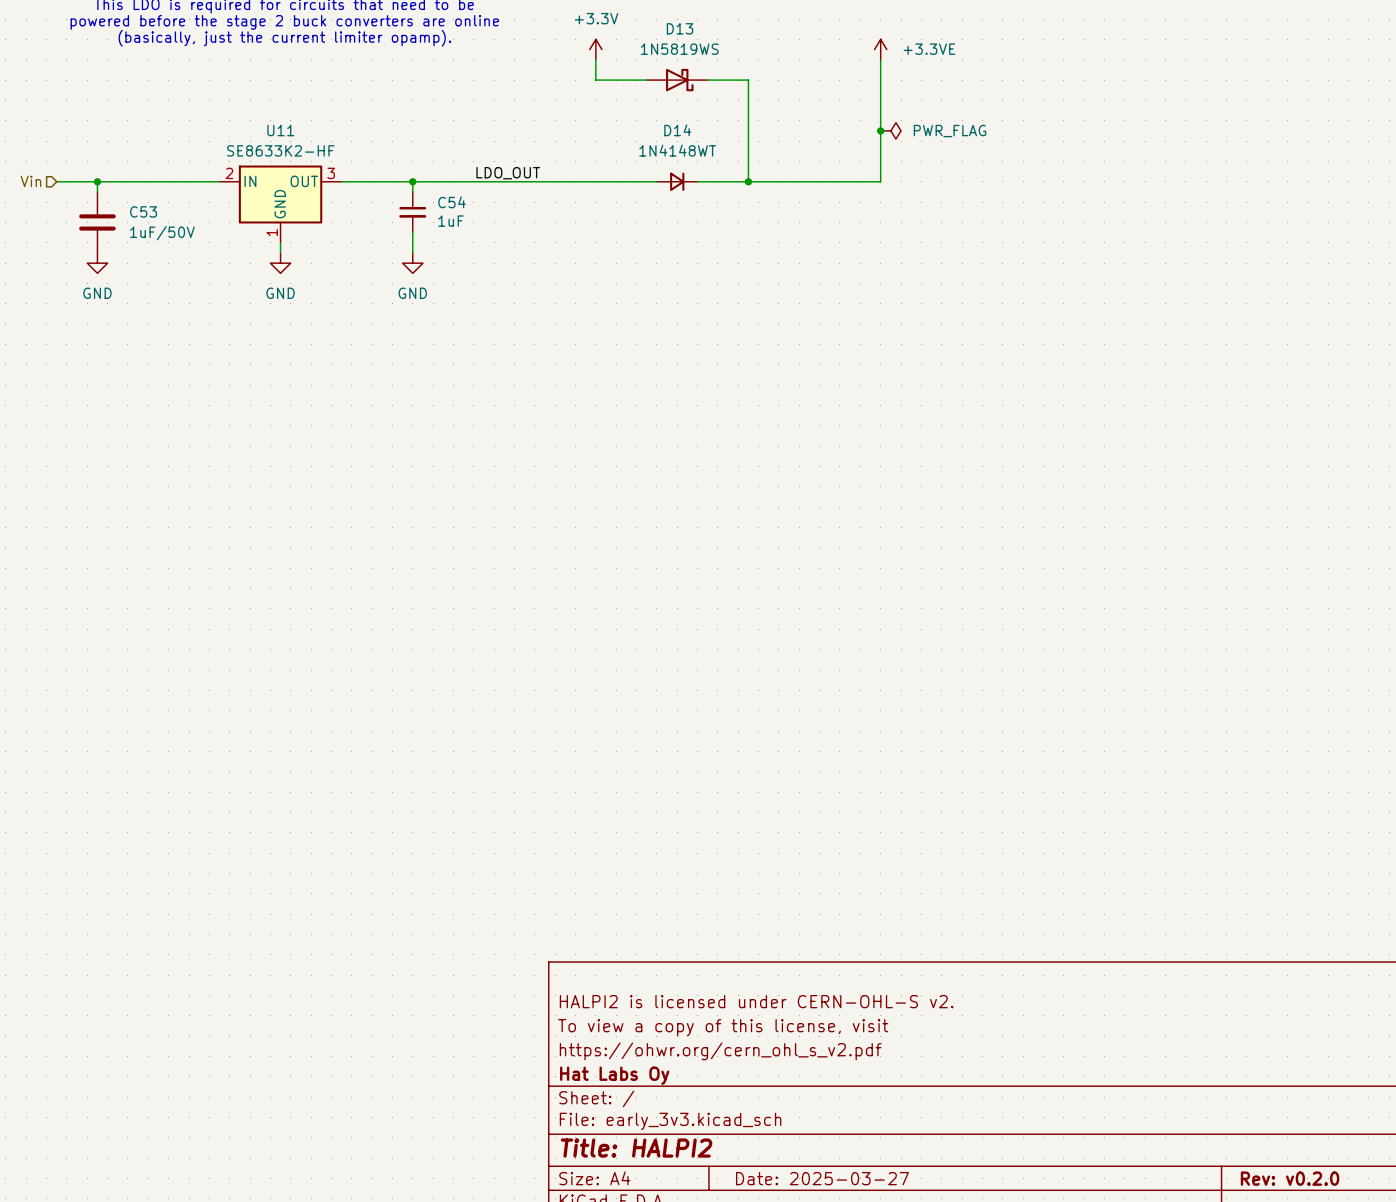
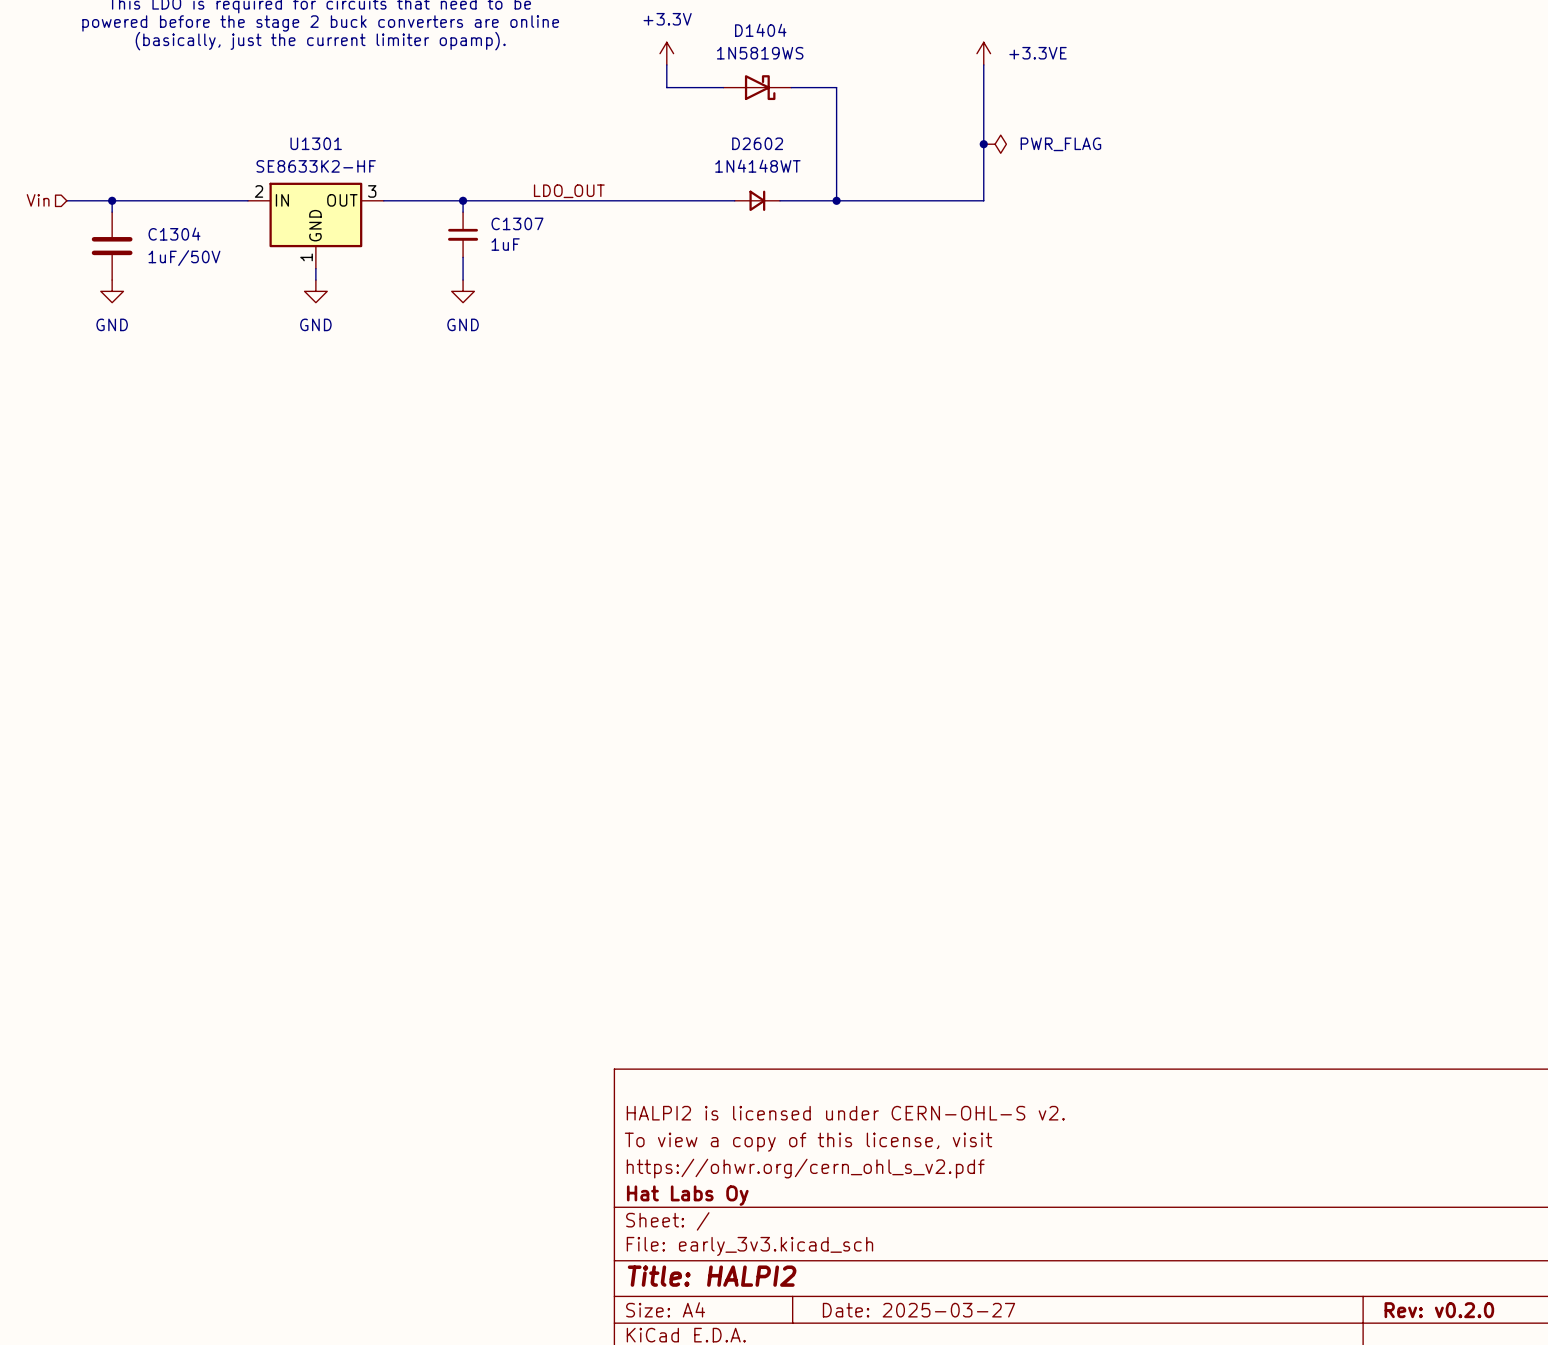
D13 name: D13 (680, 28) -> D1404 (760, 30)
U11 name: U11 (280, 130) -> U1301 (316, 143)
D14 name: D14 (677, 130) -> D2602 (757, 143)
C54 name: C54 (451, 202) -> C1307 (517, 223)
C53 name: C53 (143, 211) -> C1304 (174, 234)

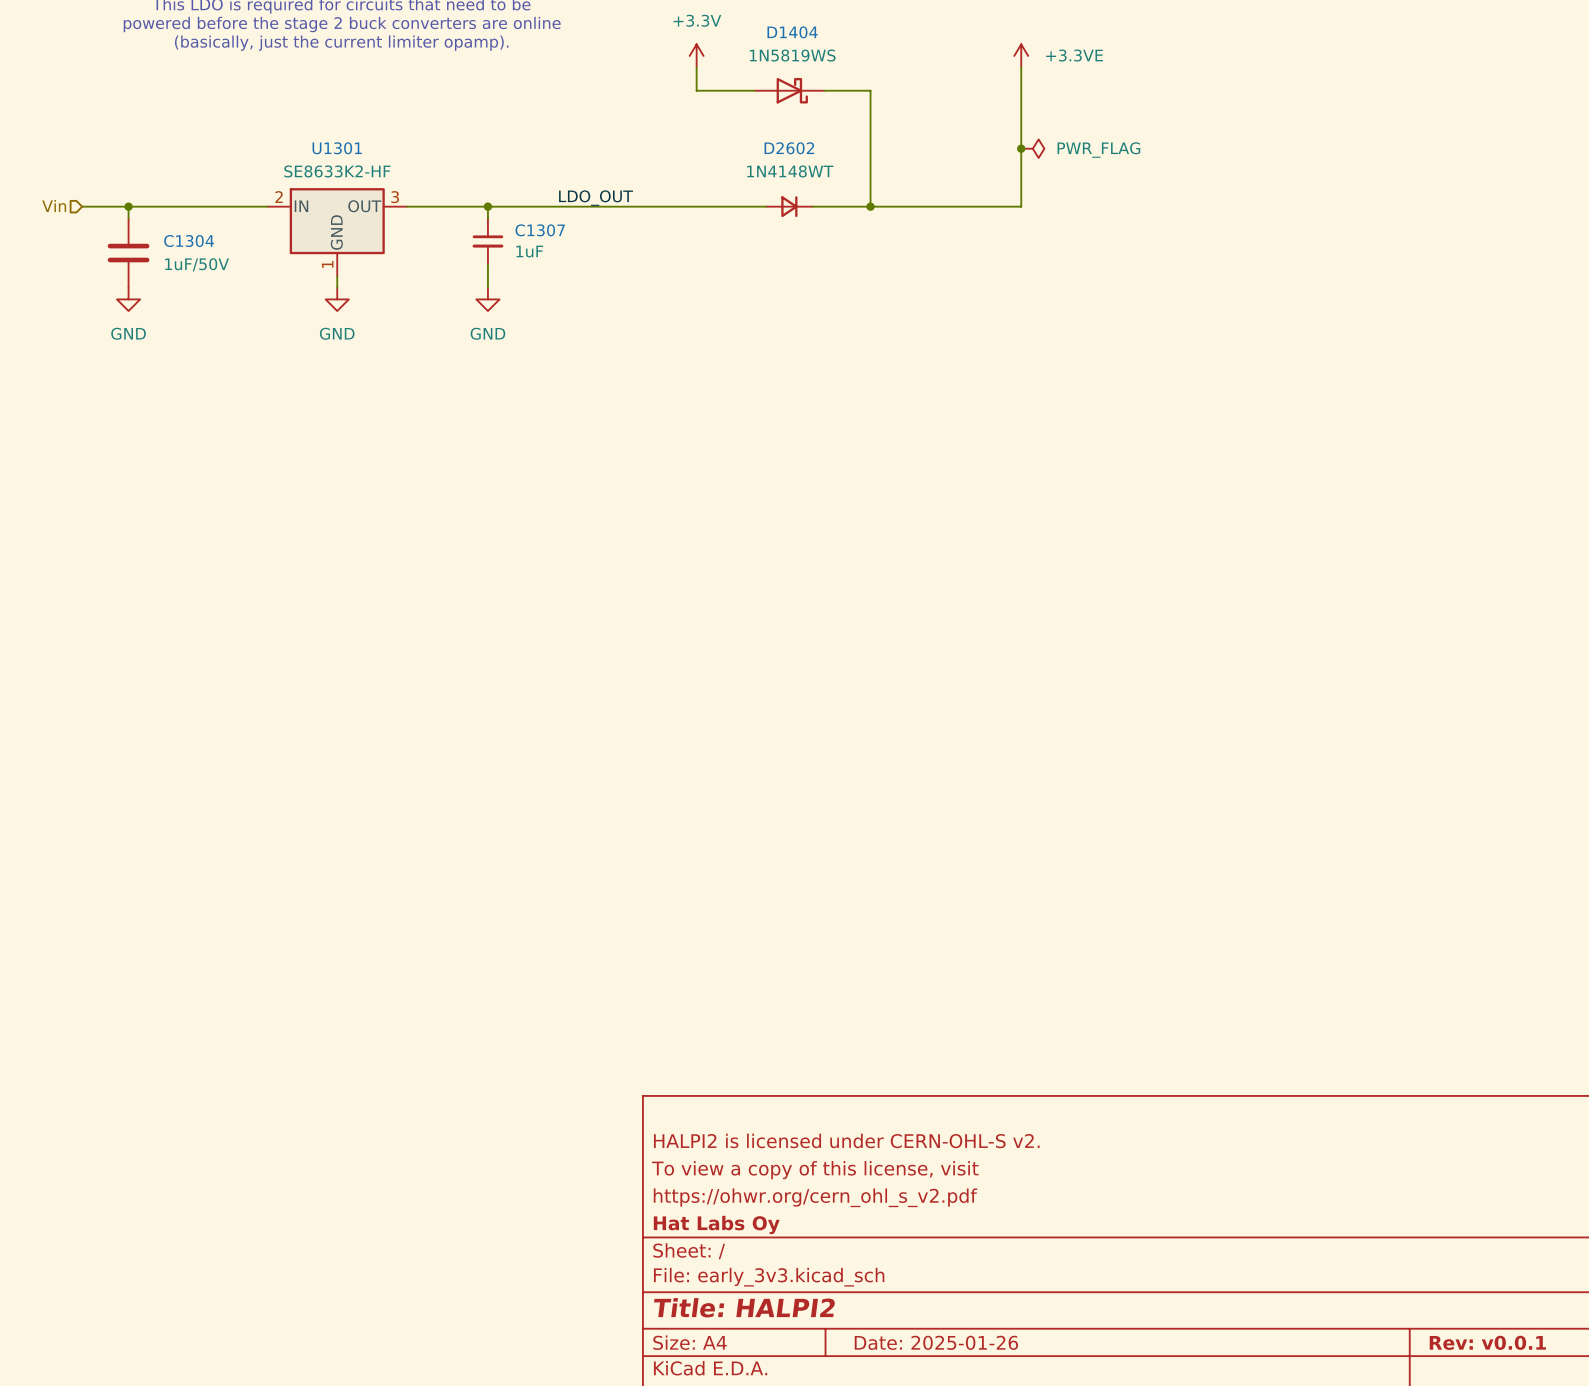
title block: Date: 2025-03-27 (918, 1310) -> Date: 2025-01-26 (936, 1342)
title block: Rev: v0.2.0 (1439, 1310) -> Rev: v0.0.1 (1487, 1342)

